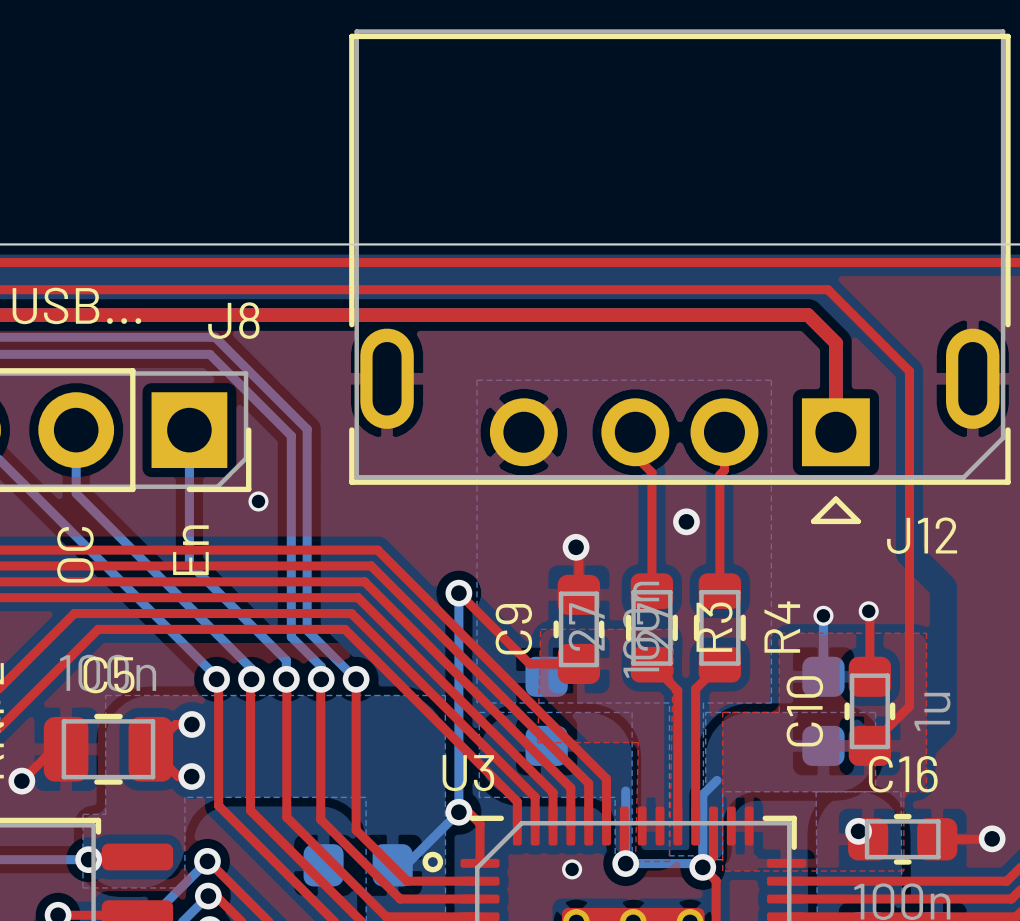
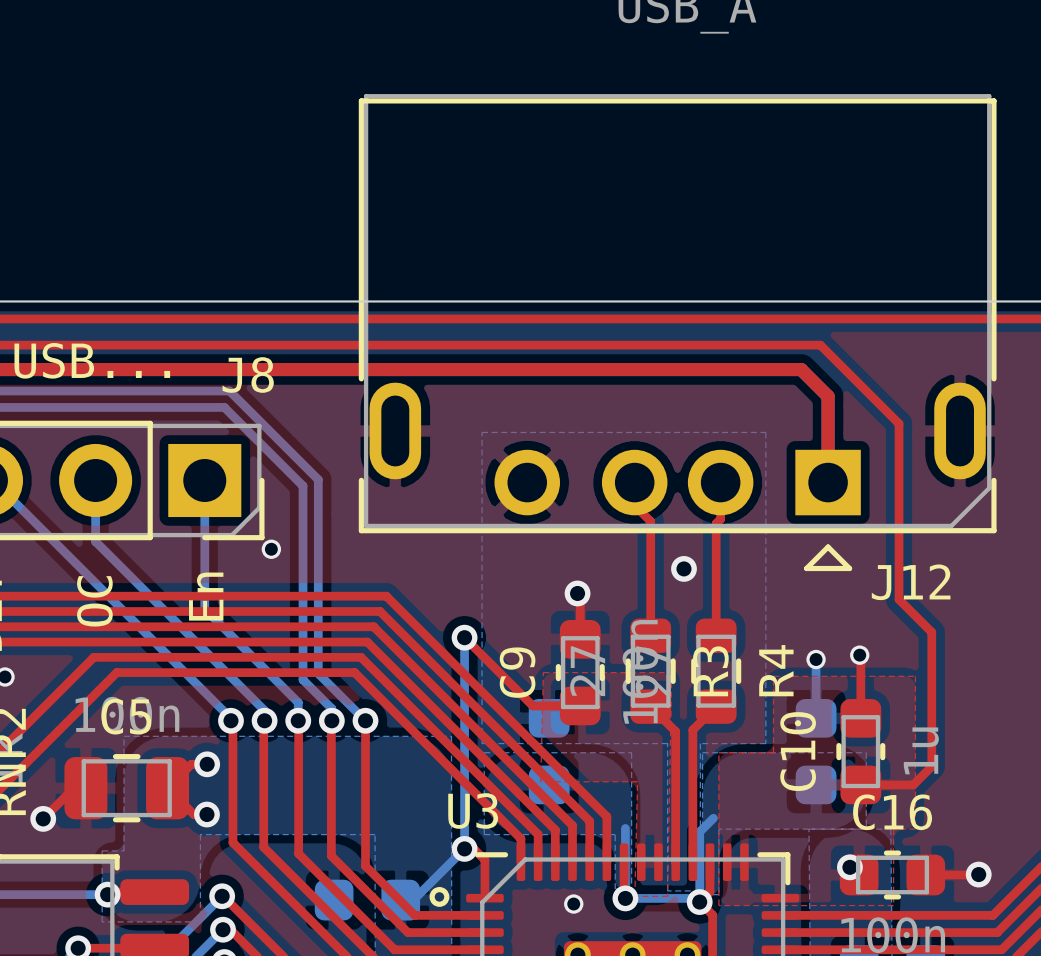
top track: (909, 553) (909, 706) (869, 745) -> (899, 599) (931, 632) (931, 766) (913, 784) (860, 784)

